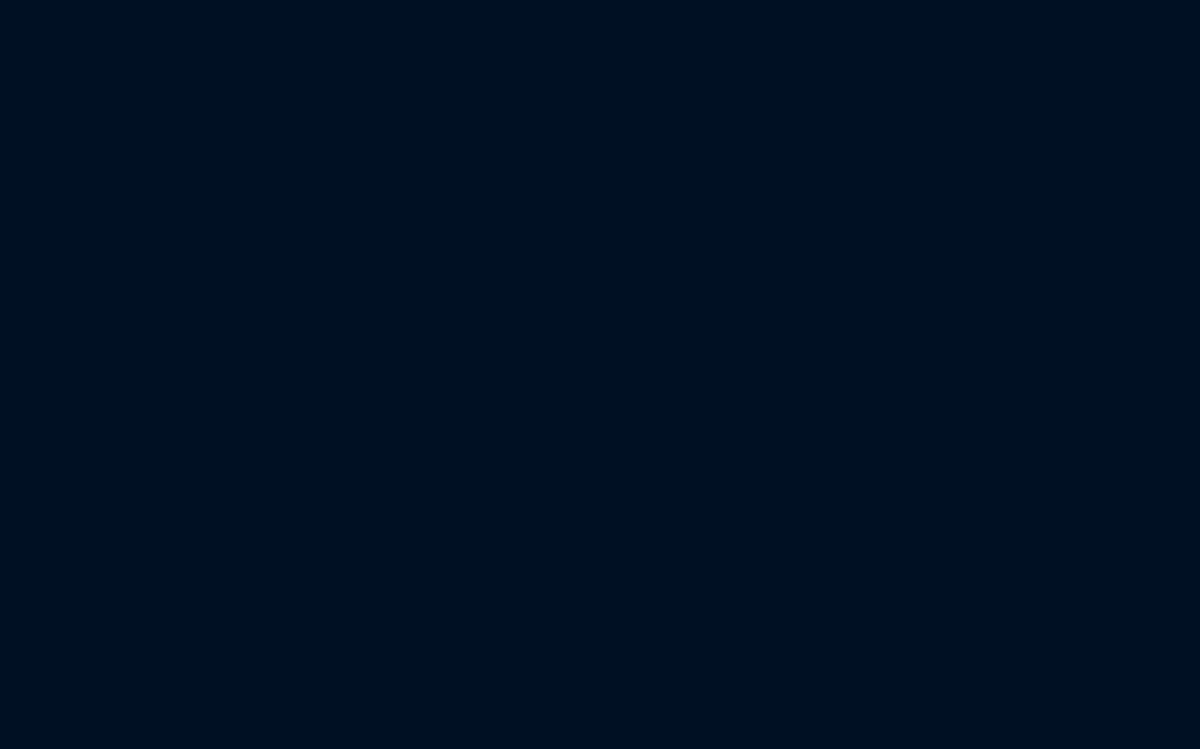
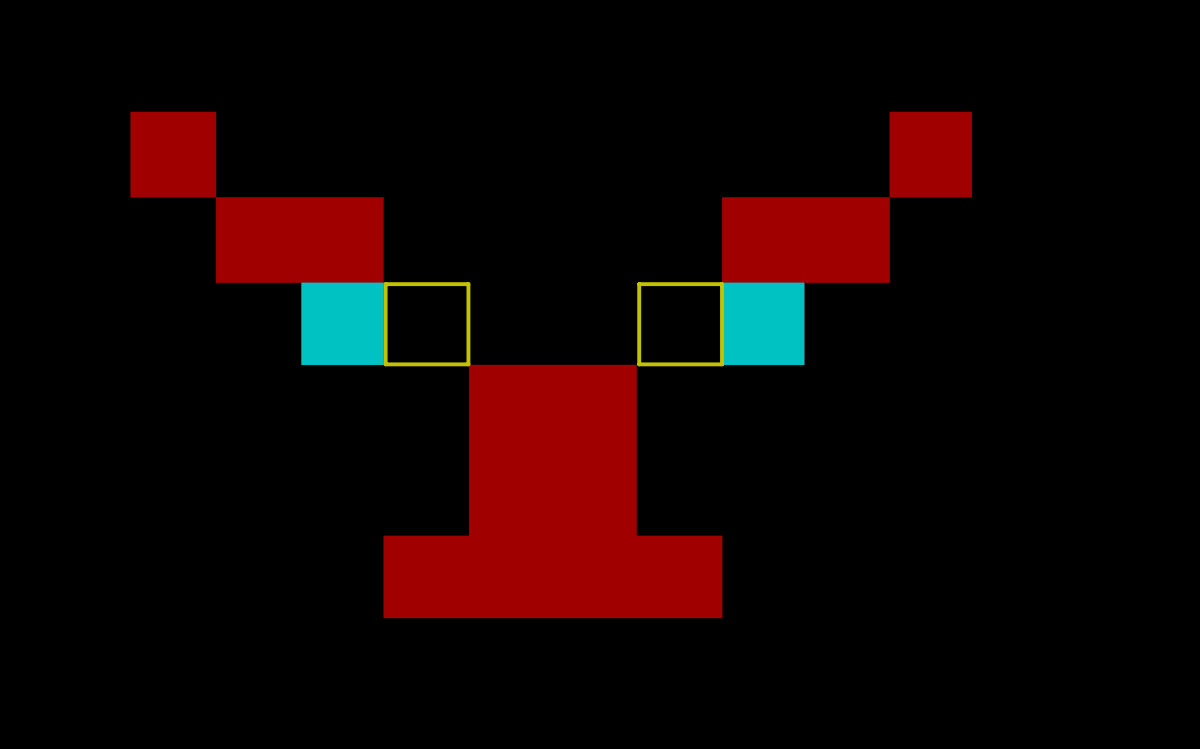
drawing: none -> [130, 111, 973, 619]

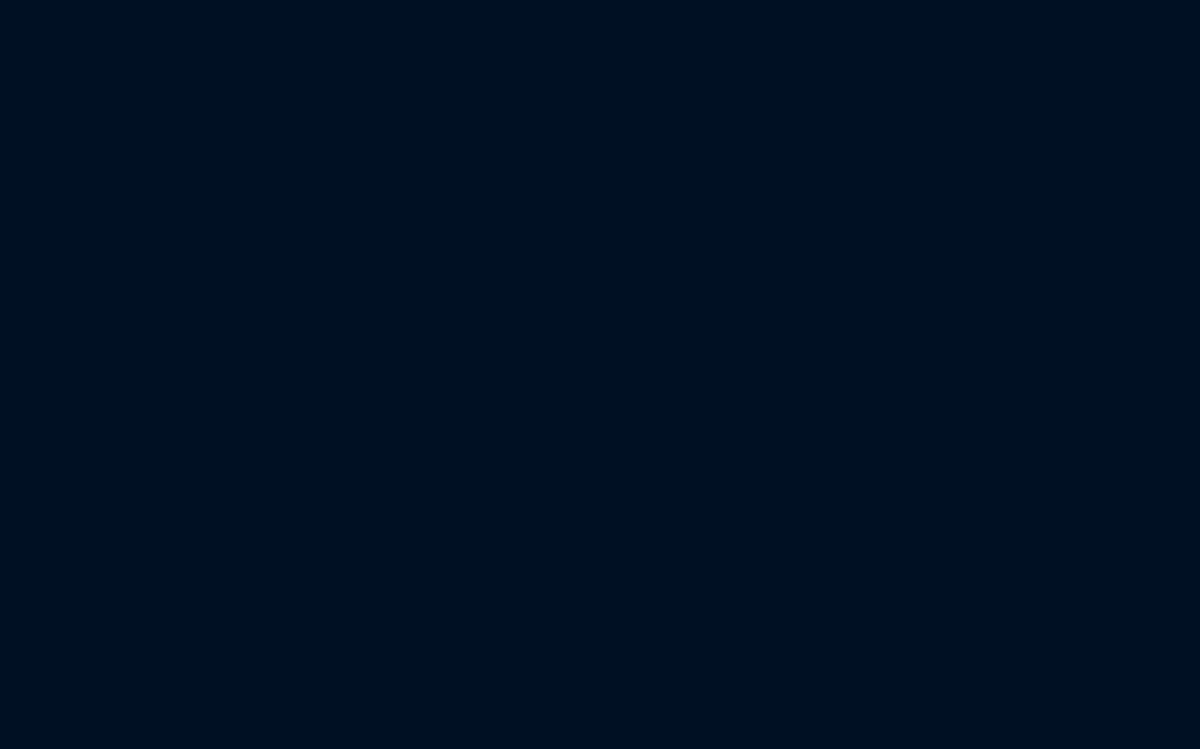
drawing: [130, 111, 973, 619] -> none

